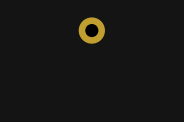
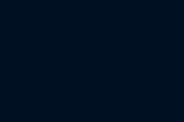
via: (91, 30) -> none

